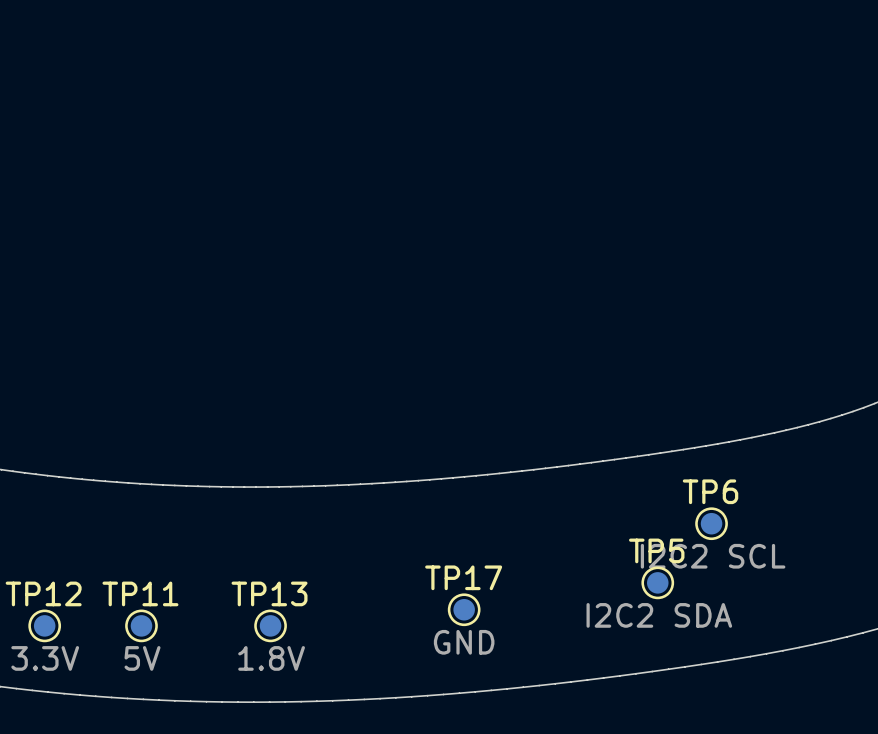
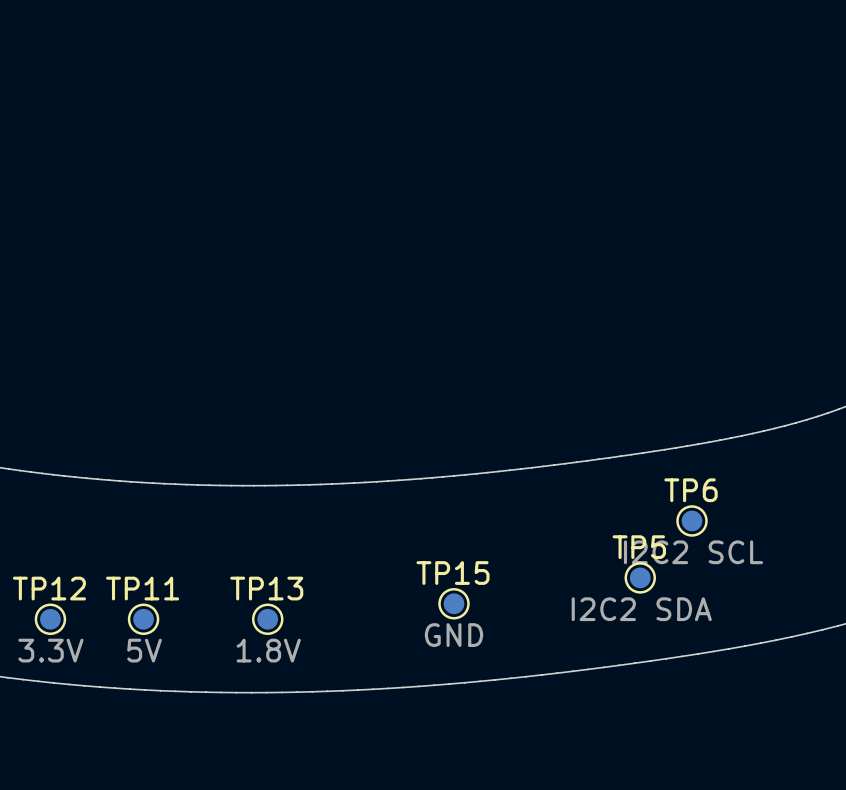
TP17 name: TP17 (463, 577) -> TP15 (453, 573)

